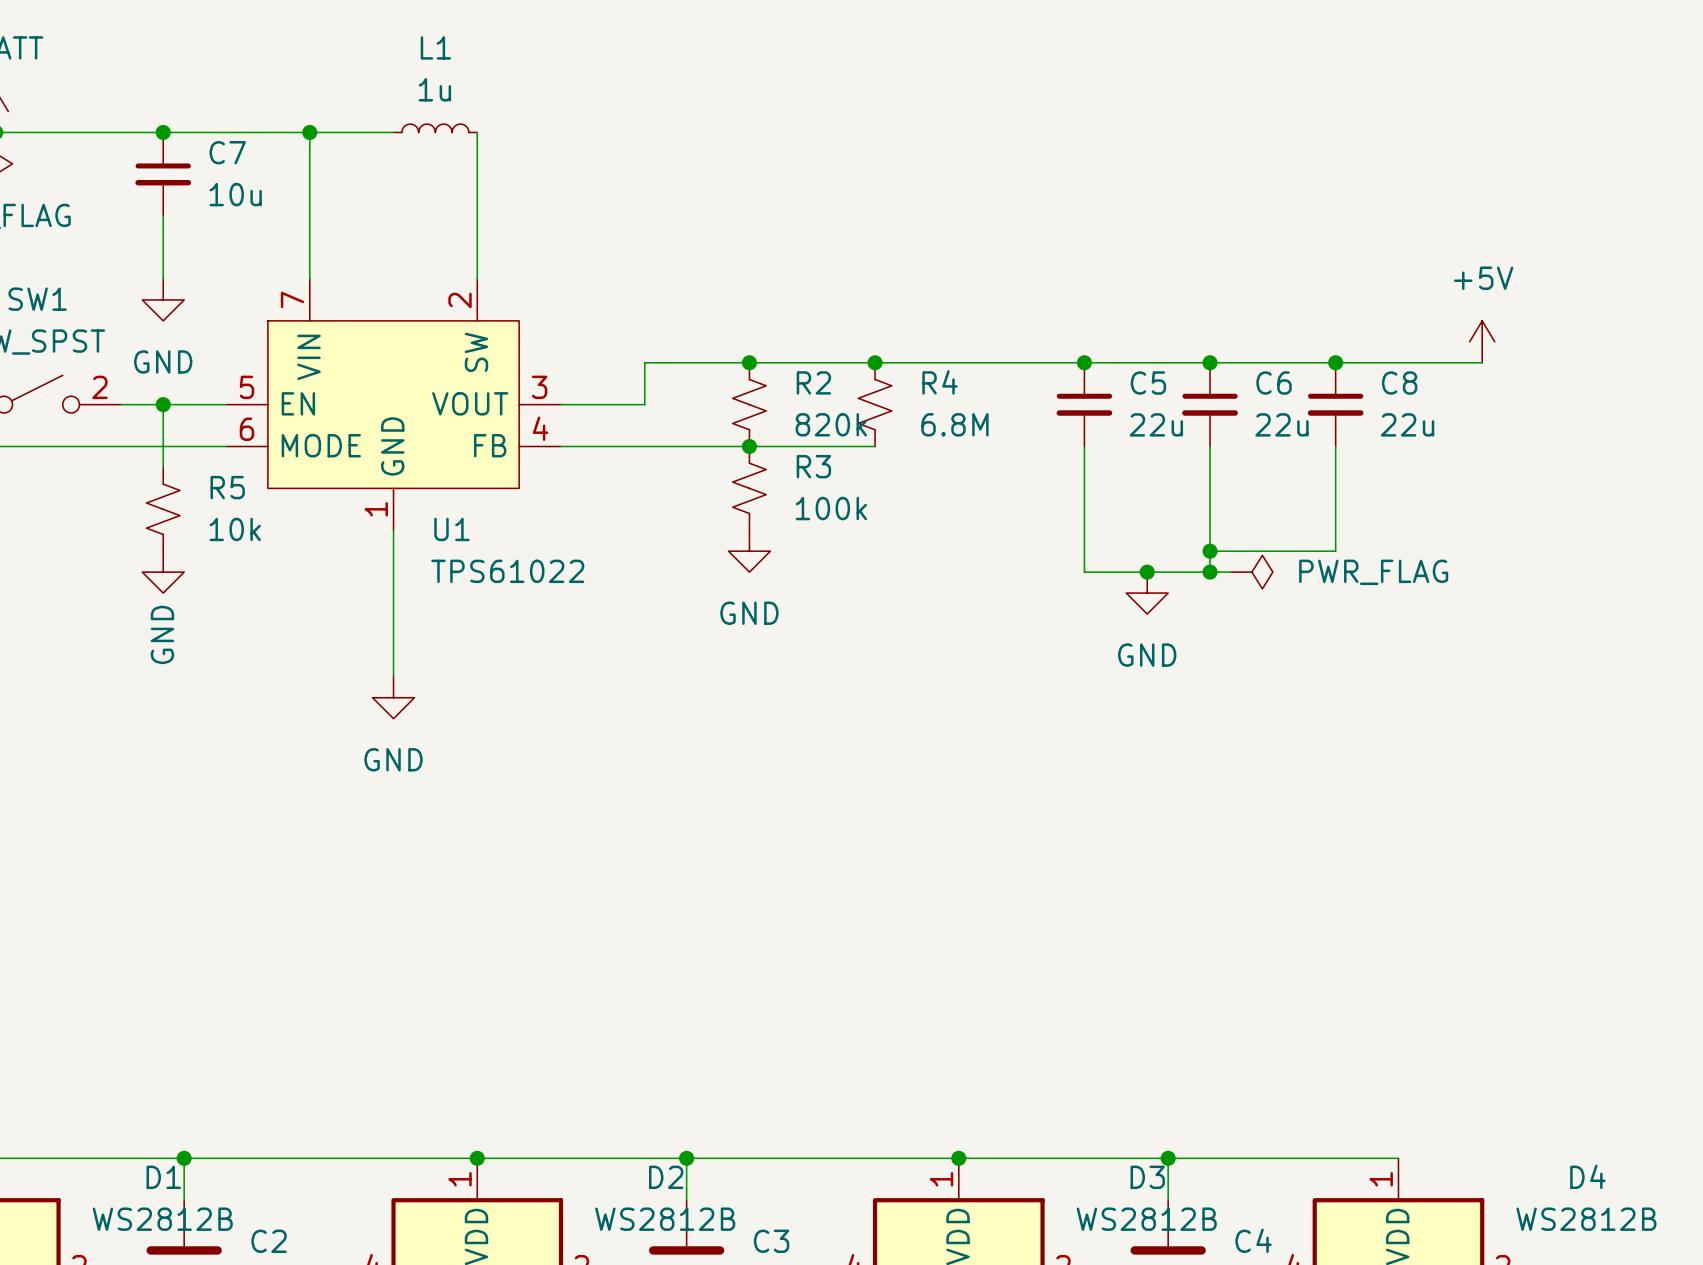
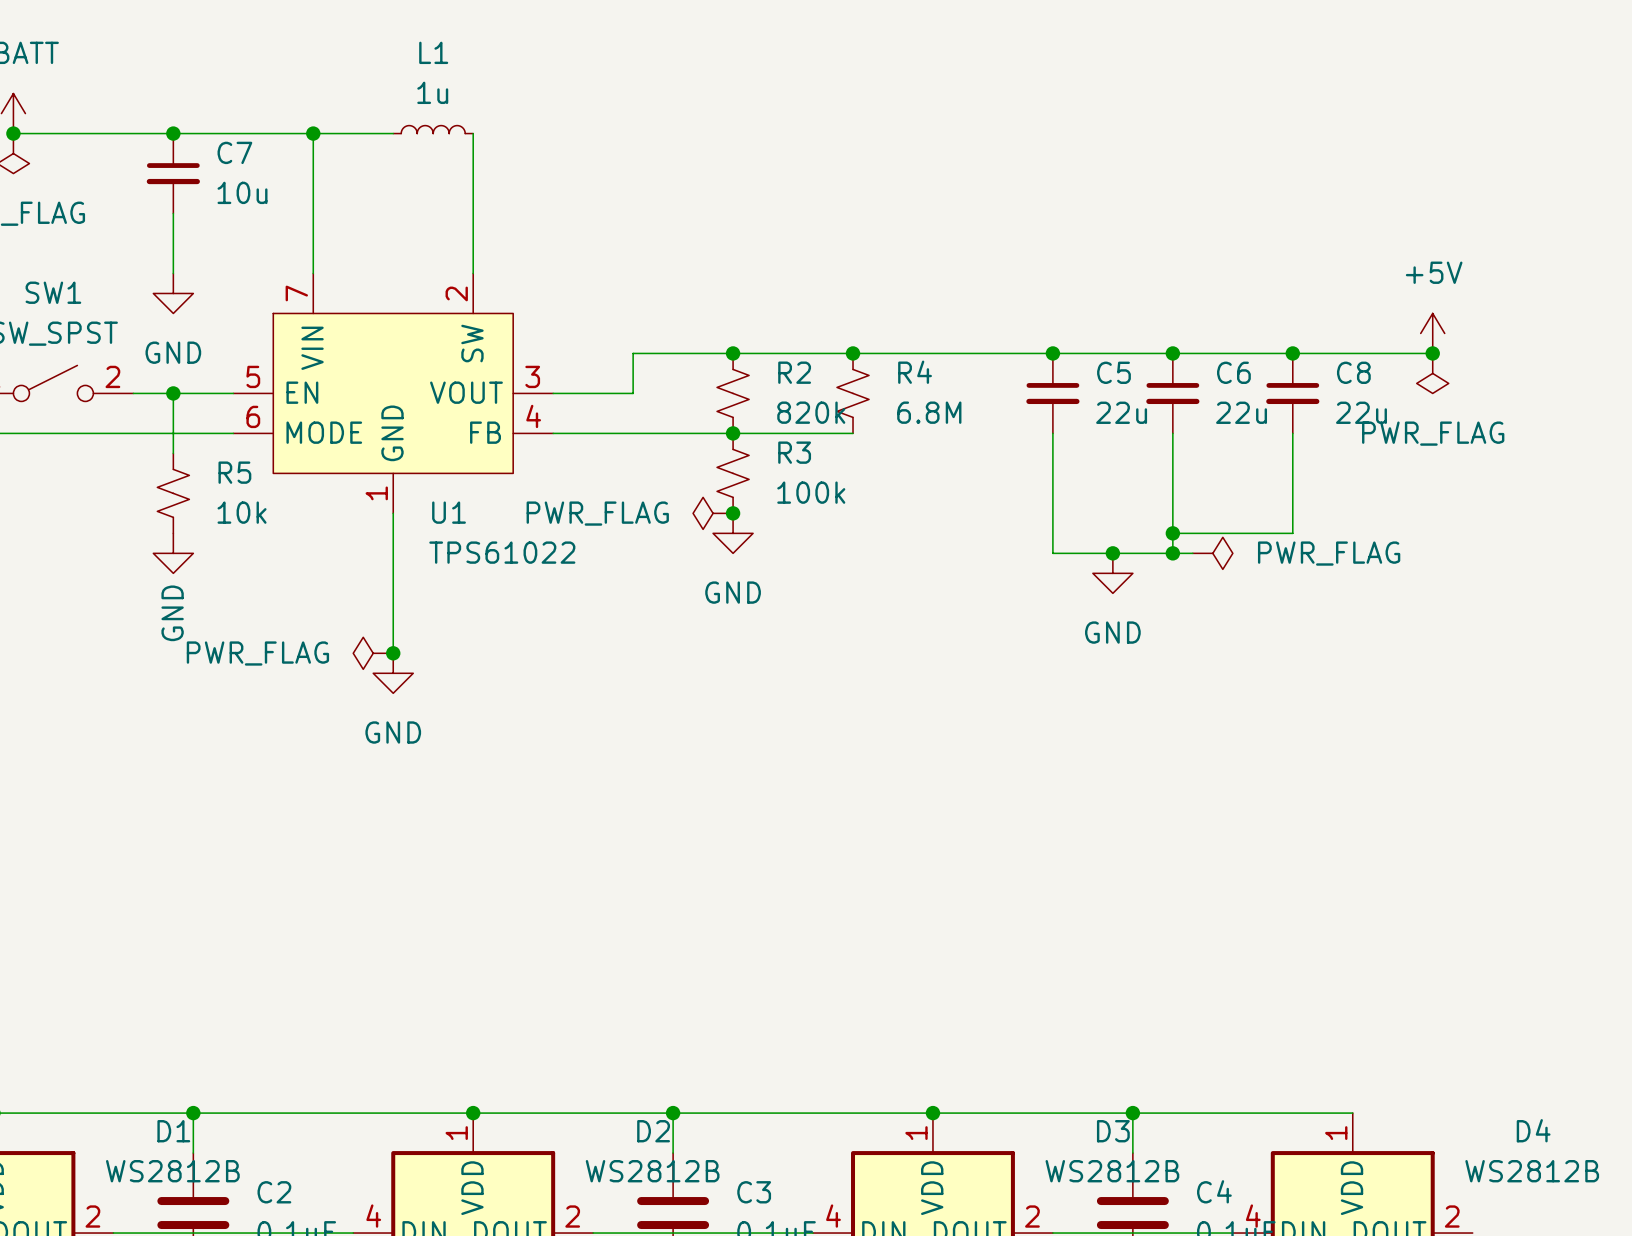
junction: none -> (1432, 353)
power symbol: none -> PWR_FLAG (1432, 373)
power symbol: none -> PWR_FLAG (713, 513)
junction: none -> (733, 513)
power symbol: none -> PWR_FLAG (373, 653)
junction: none -> (393, 653)

